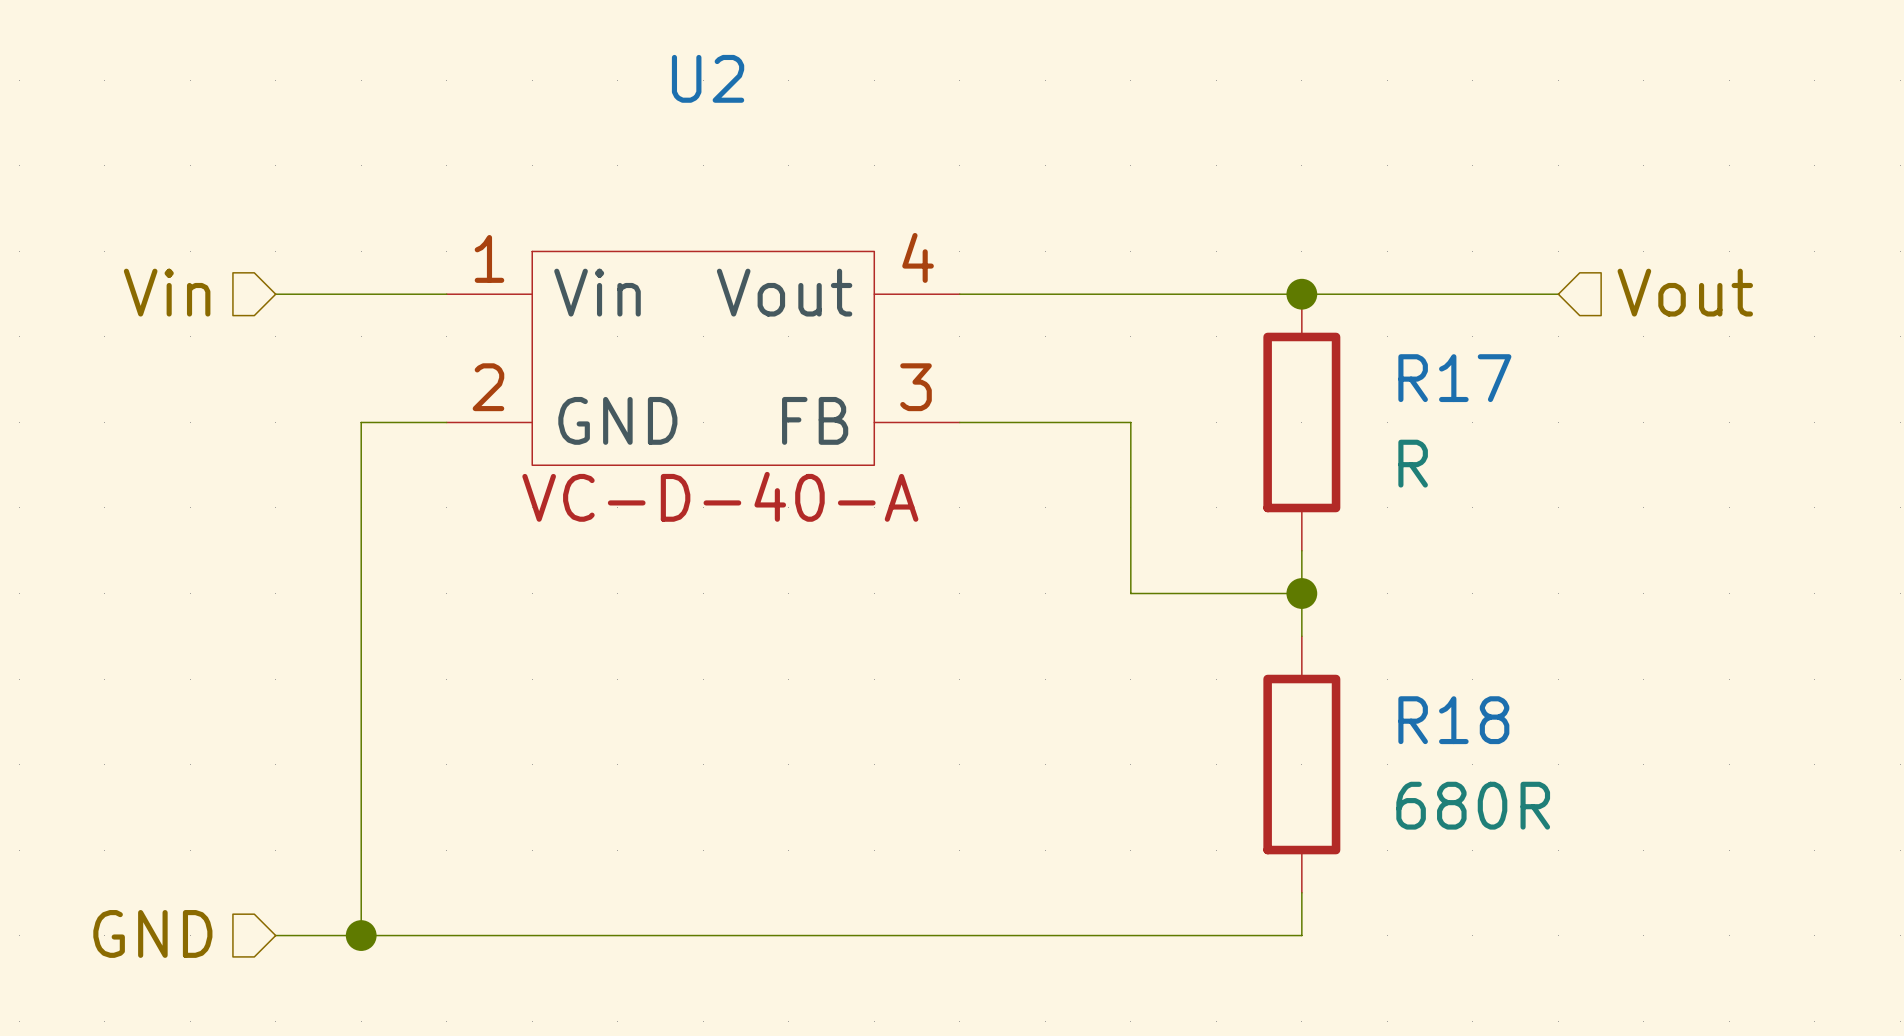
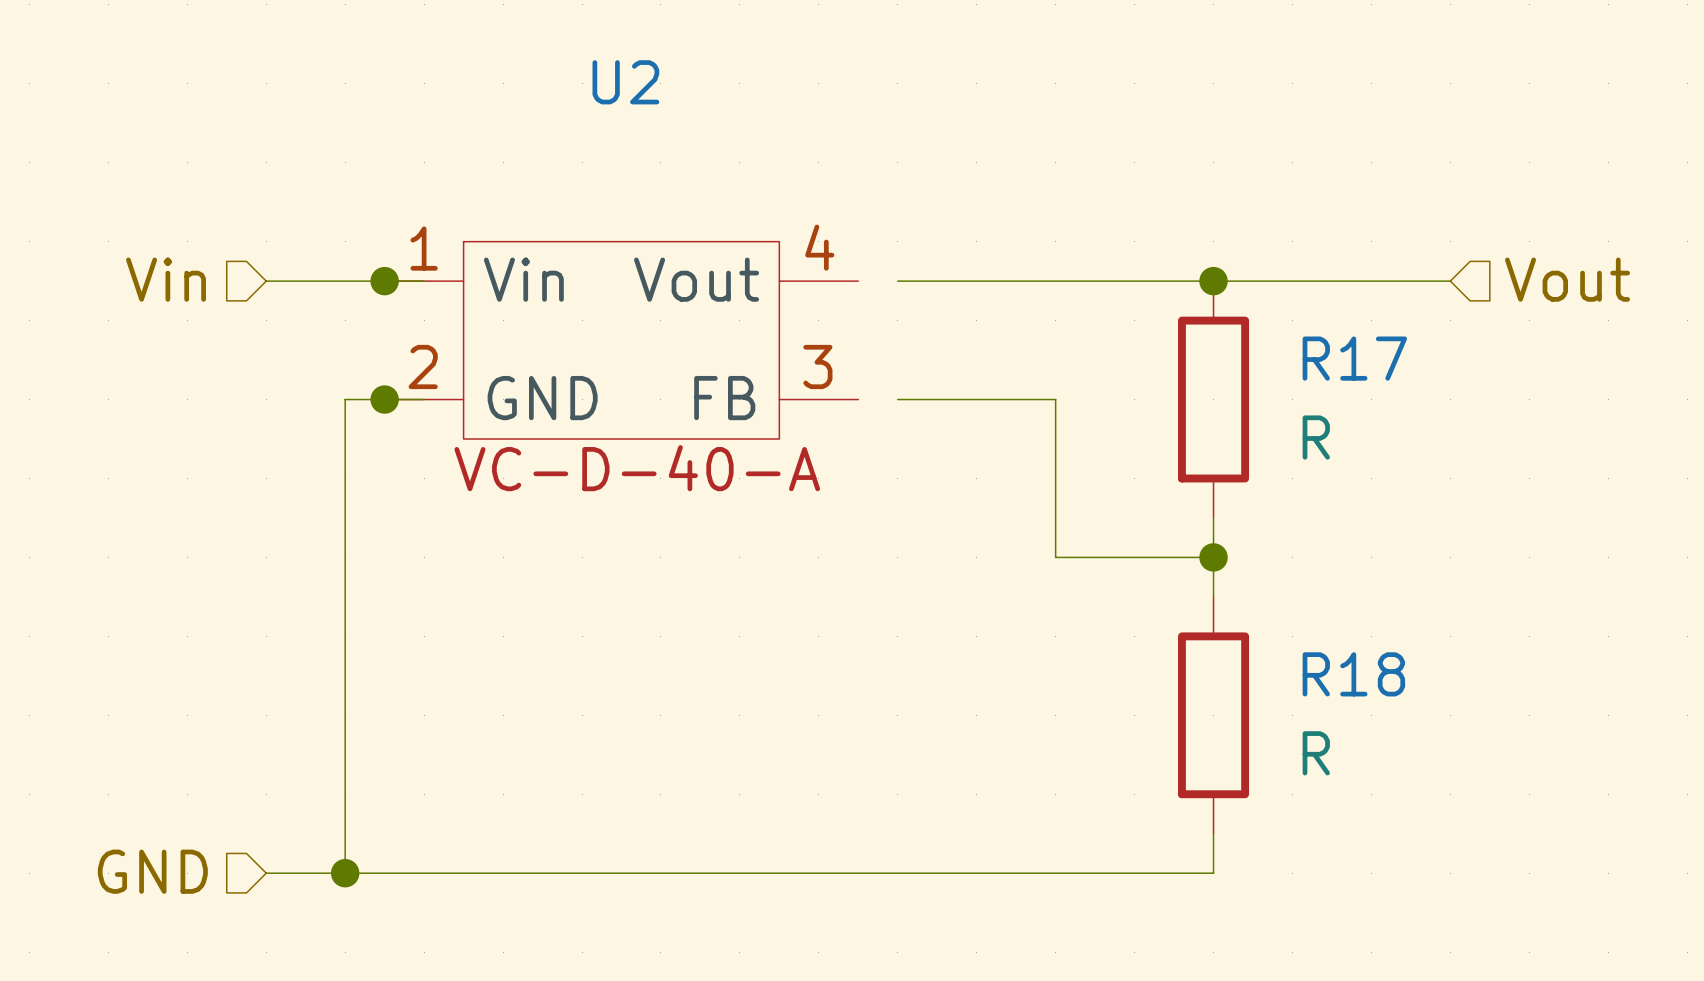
junction: none -> (384, 281)
U2 position: (703, 358) -> (621, 340)
junction: none -> (384, 399)
R18 value: 680R (1473, 805) -> R (1316, 753)

